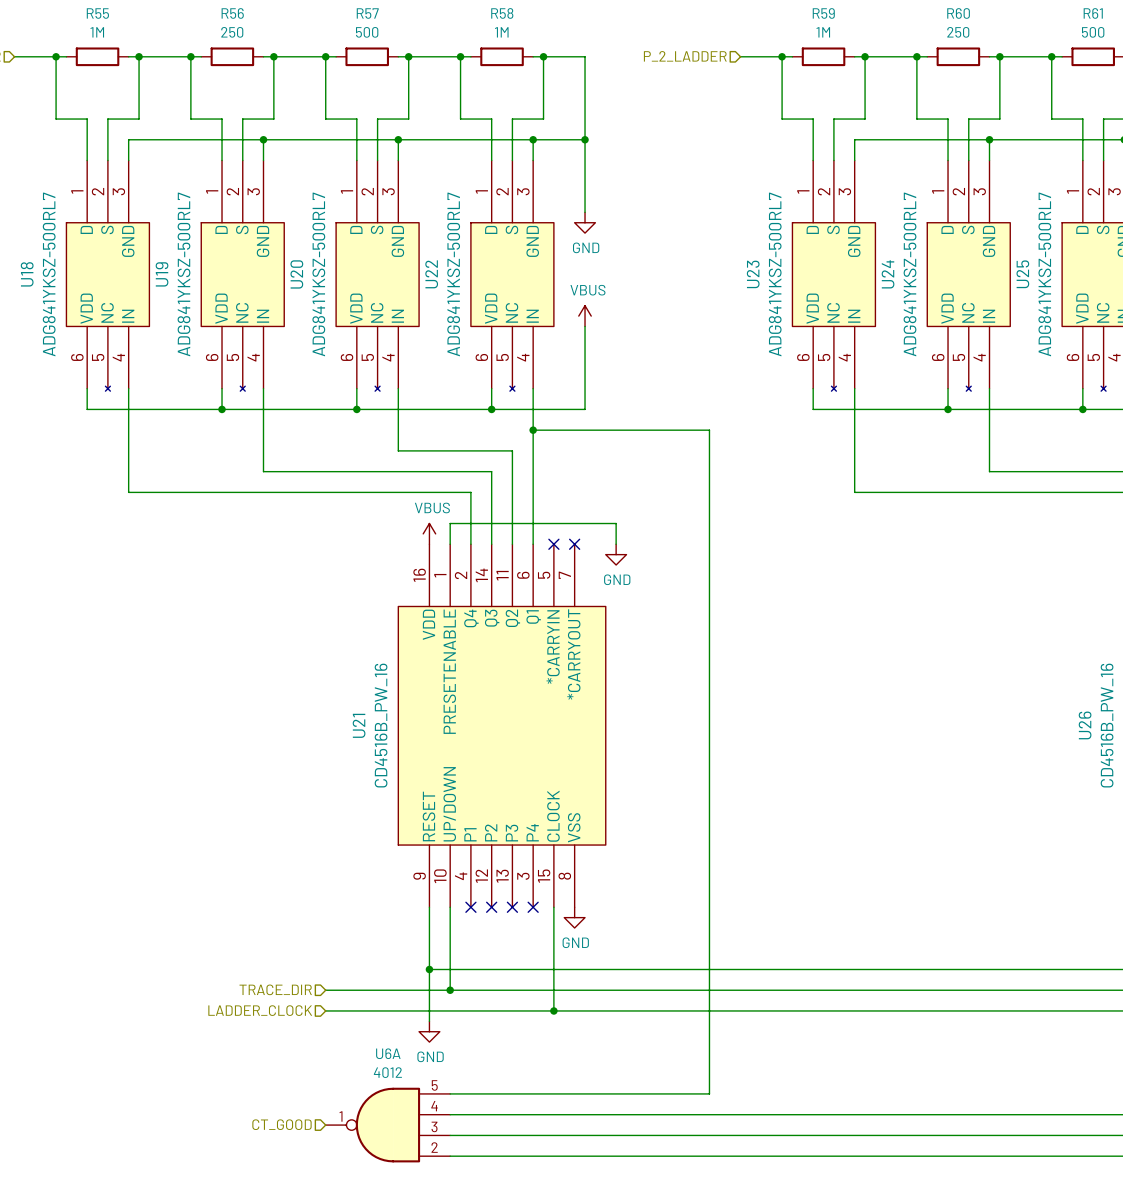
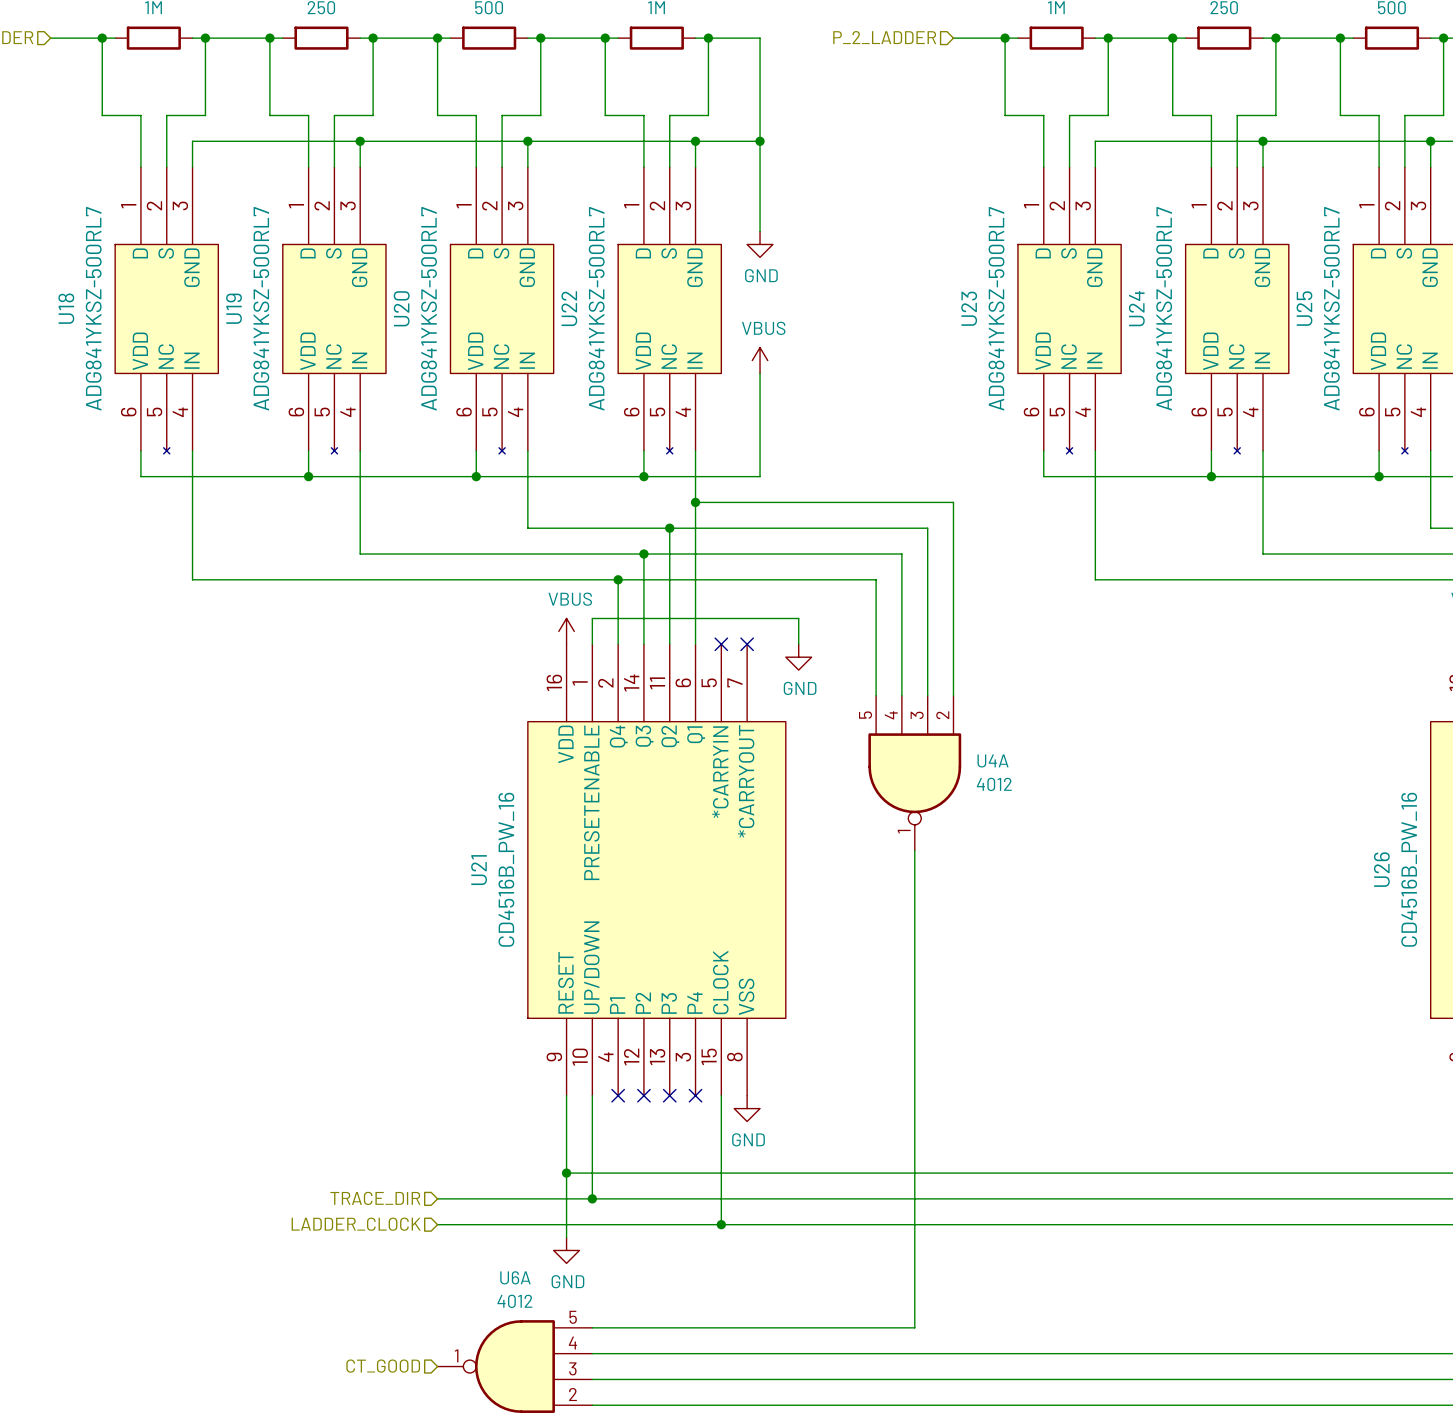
wire: (709, 430) (709, 710) -> (914, 502) (953, 502) (953, 695)
wire: none -> (669, 528) (927, 528) (927, 695)
junction: none -> (669, 528)
wire: none -> (643, 554) (901, 554) (901, 695)
junction: none -> (643, 554)
wire: none -> (618, 579) (876, 579) (876, 695)
junction: none -> (618, 579)
U4A: none -> 4012 (914, 773)

